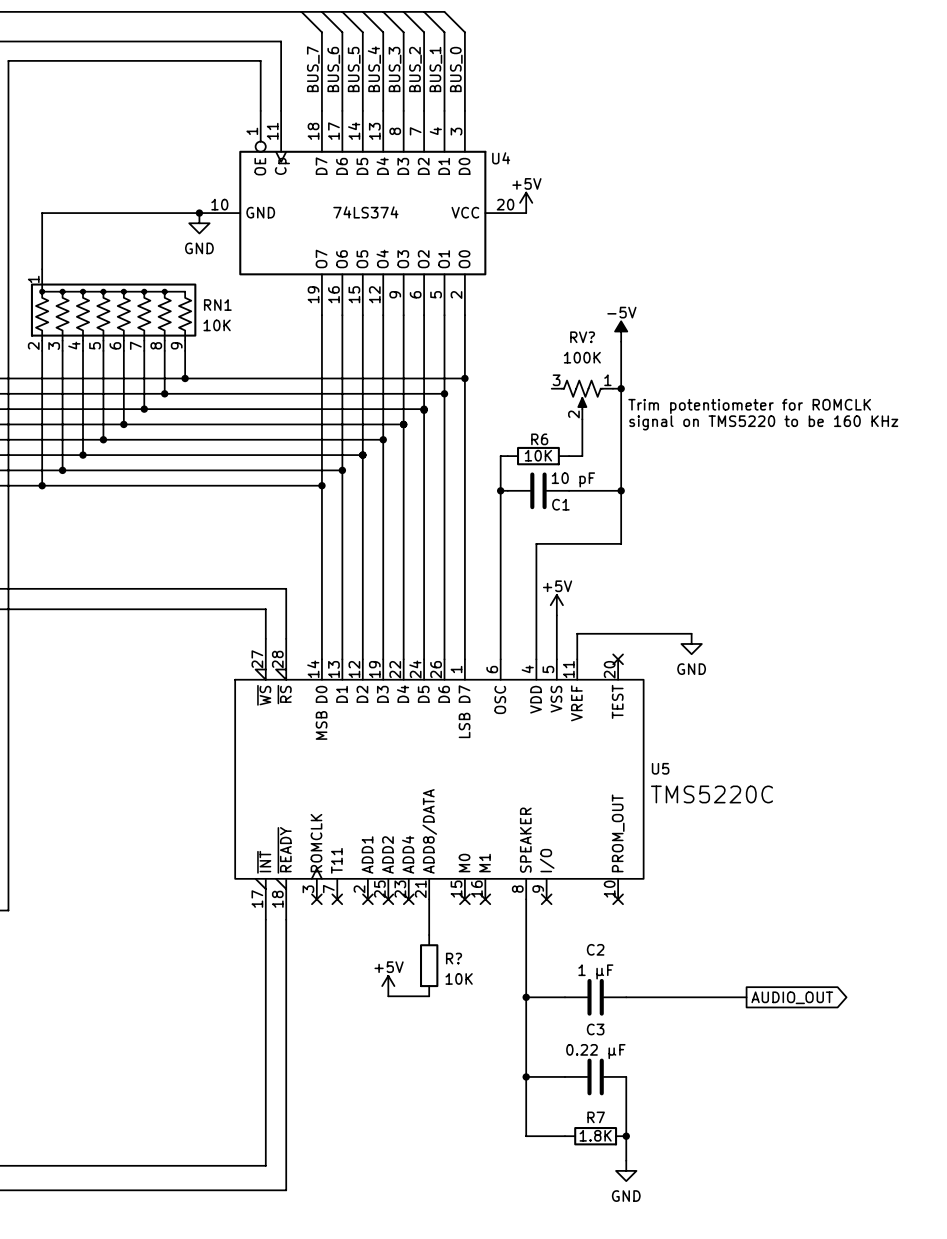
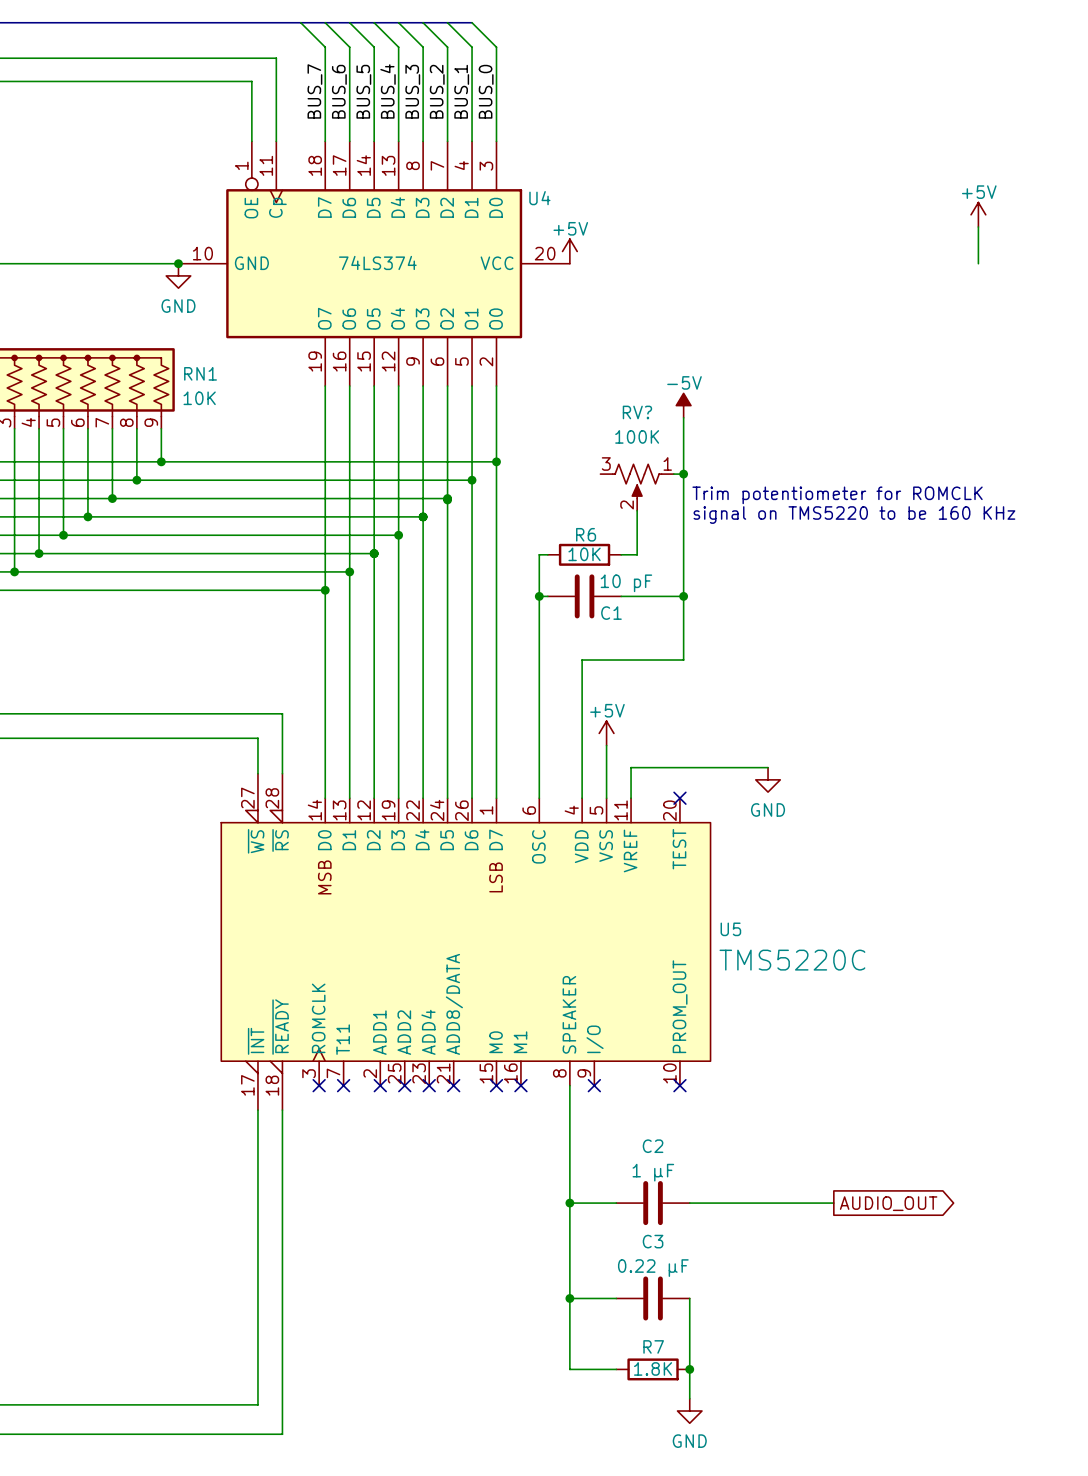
power symbol: none -> +5V (978, 214)
wire: none -> (978, 227) (978, 263)
wire: (429, 899) (429, 935) -> none
no-connect mark: none -> (453, 1085)
R?: 10K (429, 965) -> none
power symbol: +5V (388, 986) -> none
wire: (388, 996) (429, 996) -> none

